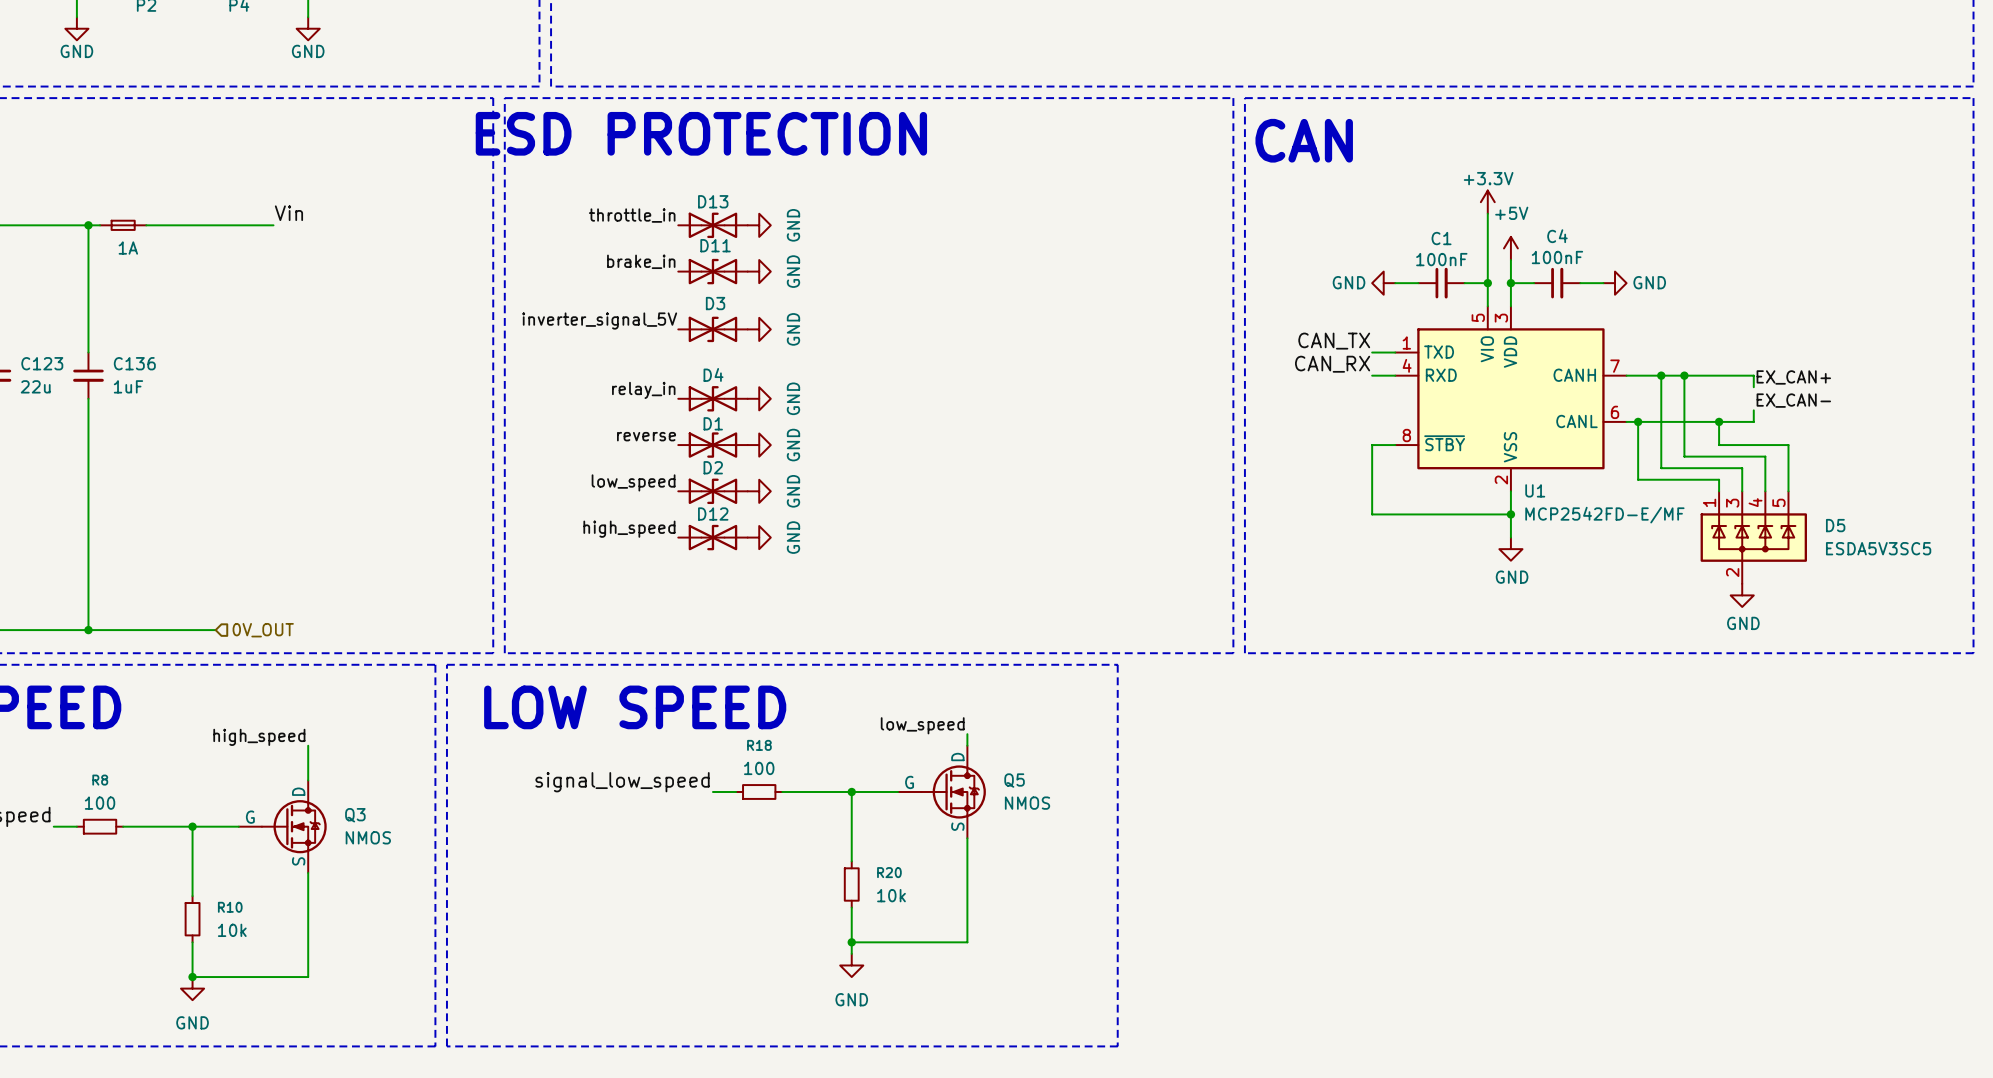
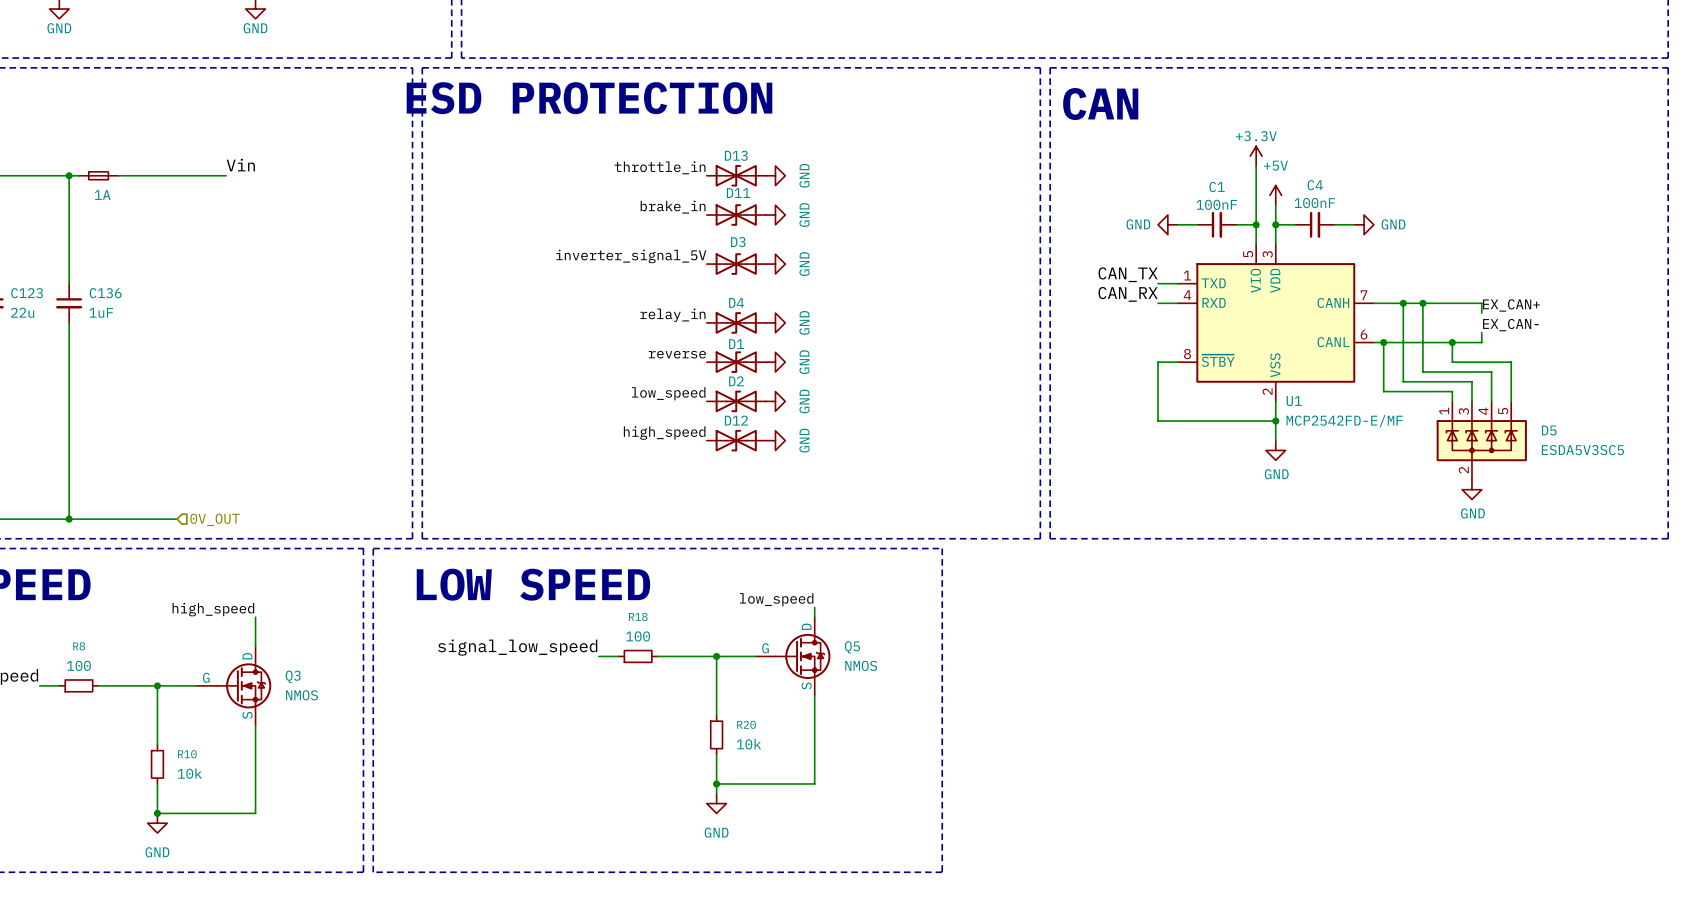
label position: throttle_in (632, 215) -> throttle_in (660, 167)
D13 position: (712, 225) -> (736, 175)
power symbol: GND (759, 225) -> none
power symbol: none -> GND (775, 175)
label position: brake_in (641, 261) -> brake_in (673, 207)
D11 position: (712, 271) -> (736, 215)
power symbol: GND (759, 271) -> none
power symbol: none -> GND (775, 215)
label position: inverter_signal_5V (599, 321) -> inverter_signal_5V (631, 256)
D3 position: (712, 329) -> (736, 264)
power symbol: GND (759, 329) -> none
power symbol: none -> GND (775, 264)
label position: relay_in (643, 390) -> relay_in (672, 315)
D4 position: (712, 398) -> (736, 322)
power symbol: GND (759, 398) -> none
power symbol: none -> GND (775, 322)
label position: reverse (646, 436) -> reverse (677, 354)
D1 position: (712, 445) -> (736, 362)
power symbol: GND (759, 445) -> none
power symbol: none -> GND (775, 362)
label position: low_speed (633, 482) -> low_speed (668, 393)
D2 position: (712, 491) -> (736, 401)
power symbol: GND (759, 491) -> none
power symbol: none -> GND (775, 401)
label position: high_speed (629, 529) -> high_speed (664, 433)
D12 position: (712, 537) -> (736, 440)
power symbol: GND (759, 537) -> none
power symbol: none -> GND (775, 440)

